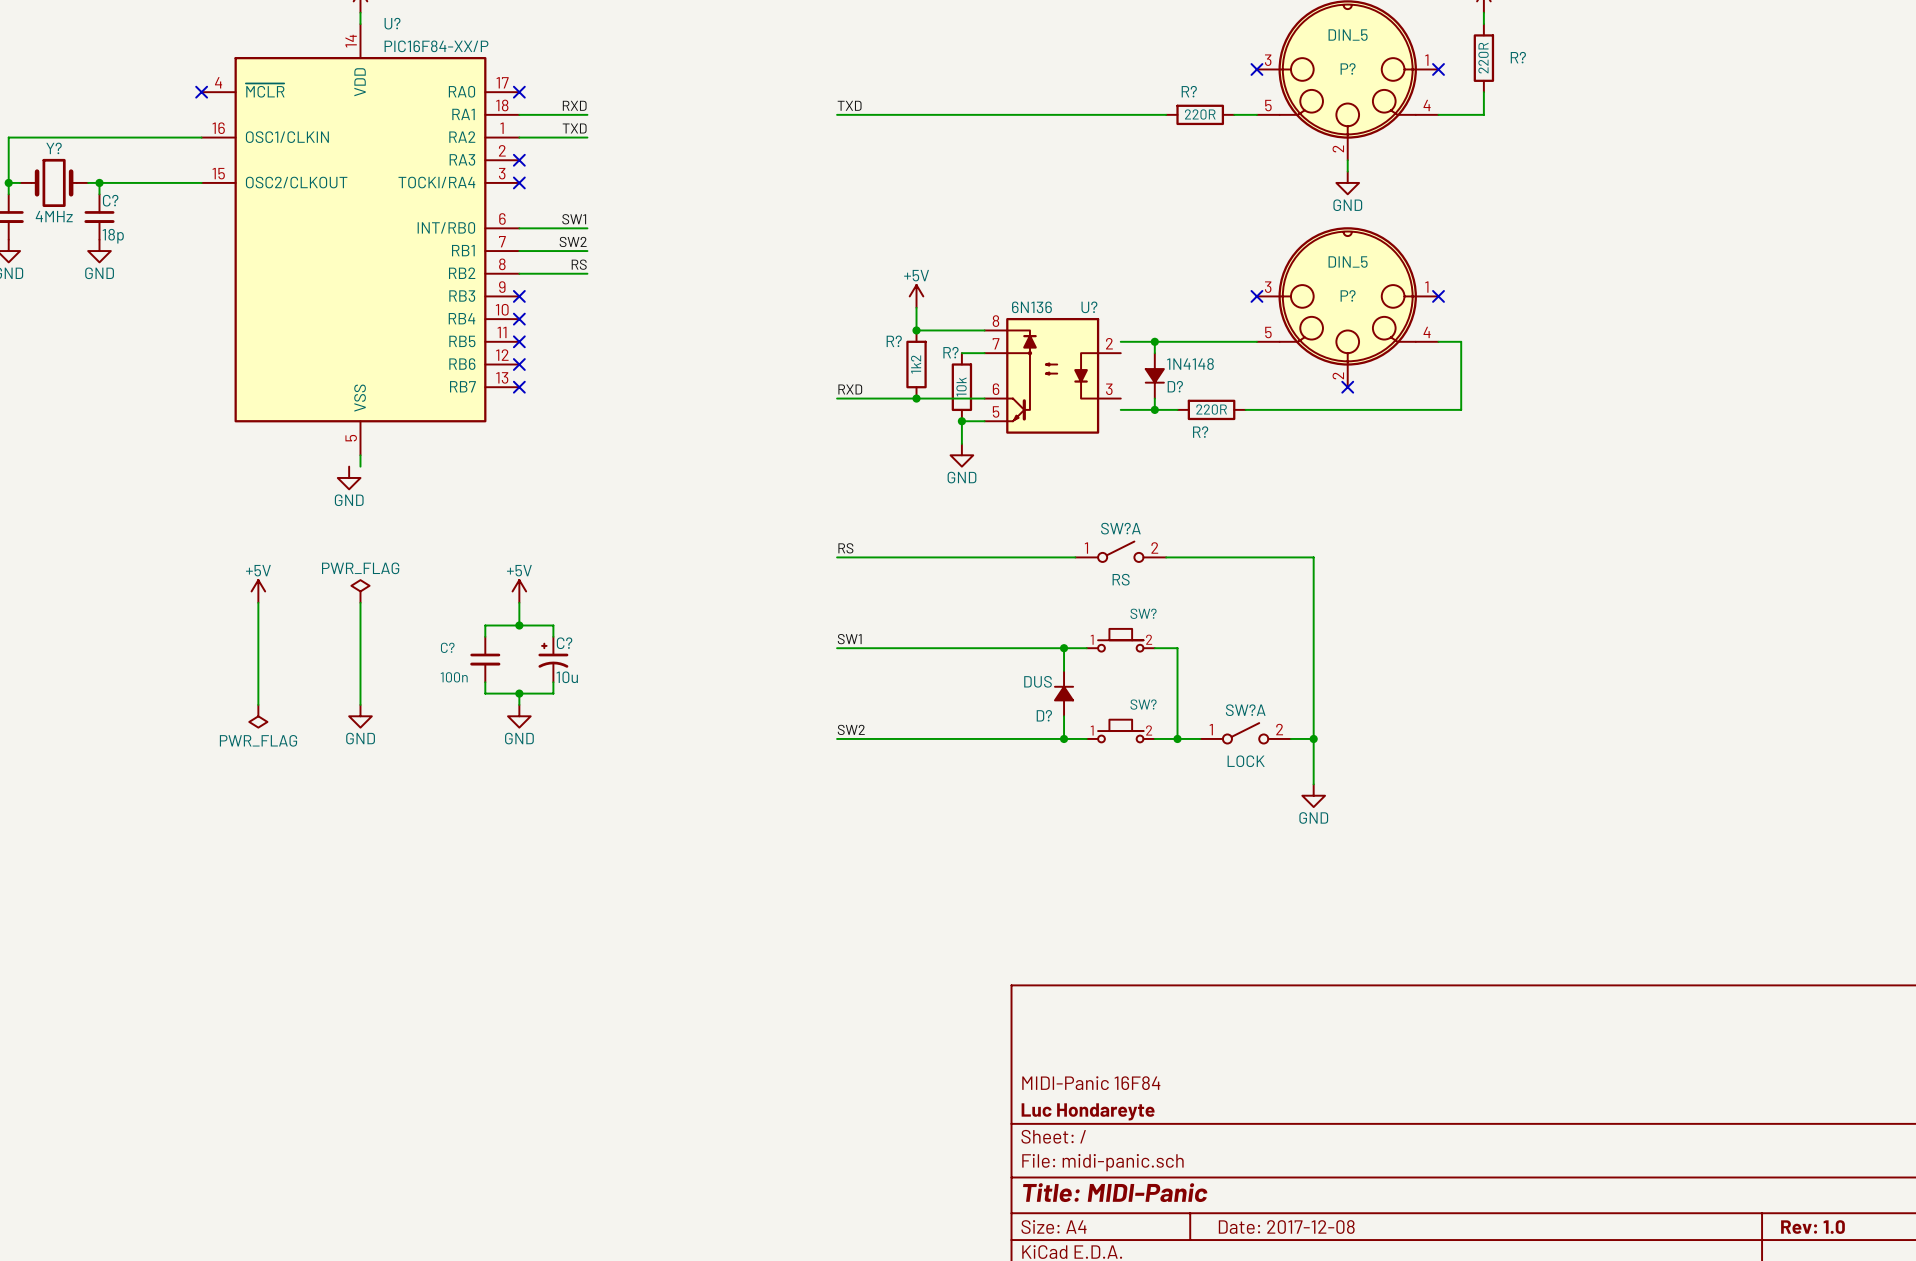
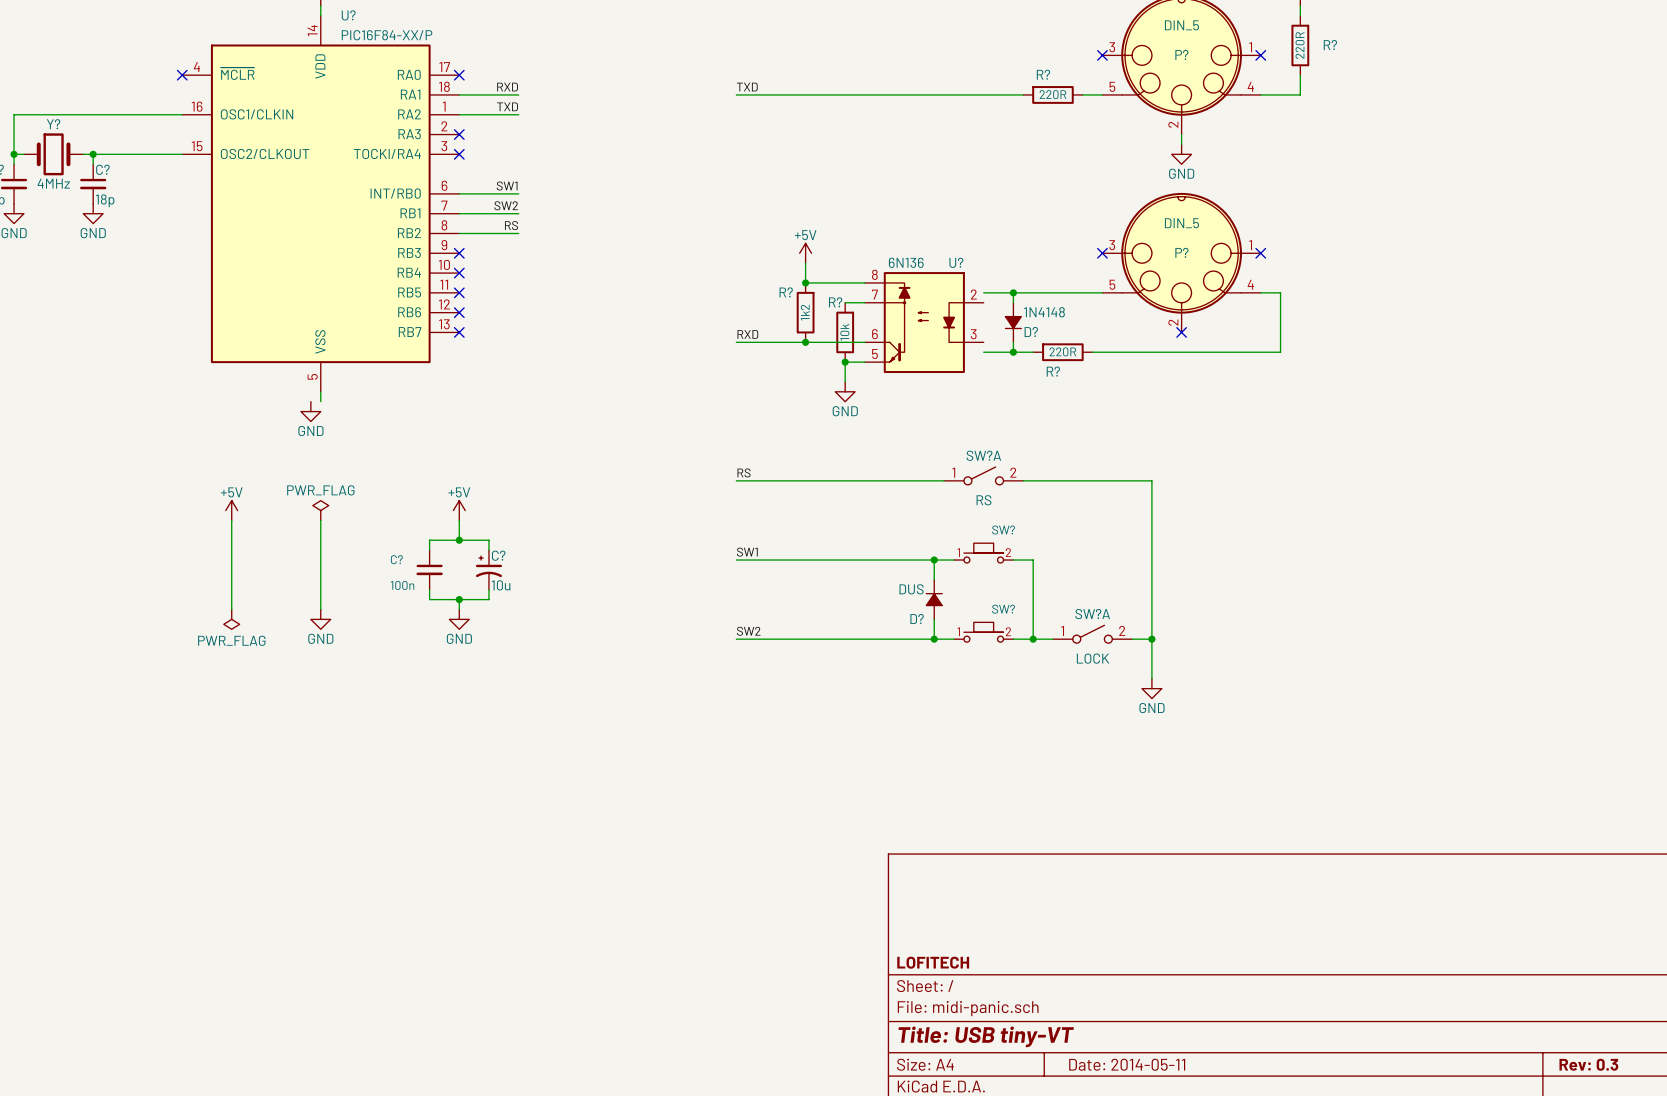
title block: MIDI-Panic 16F84 (1091, 1083) -> none
title block: Luc Hondareyte (1088, 1111) -> LOFITECH (933, 962)
title block: Title: MIDI-Panic (1115, 1192) -> Title: USB tiny-VT (986, 1036)
title block: Date: 2017-12-08 (1286, 1227) -> Date: 2014-05-11 (1127, 1064)
title block: Rev: 1.0 (1812, 1227) -> Rev: 0.3 (1588, 1064)

